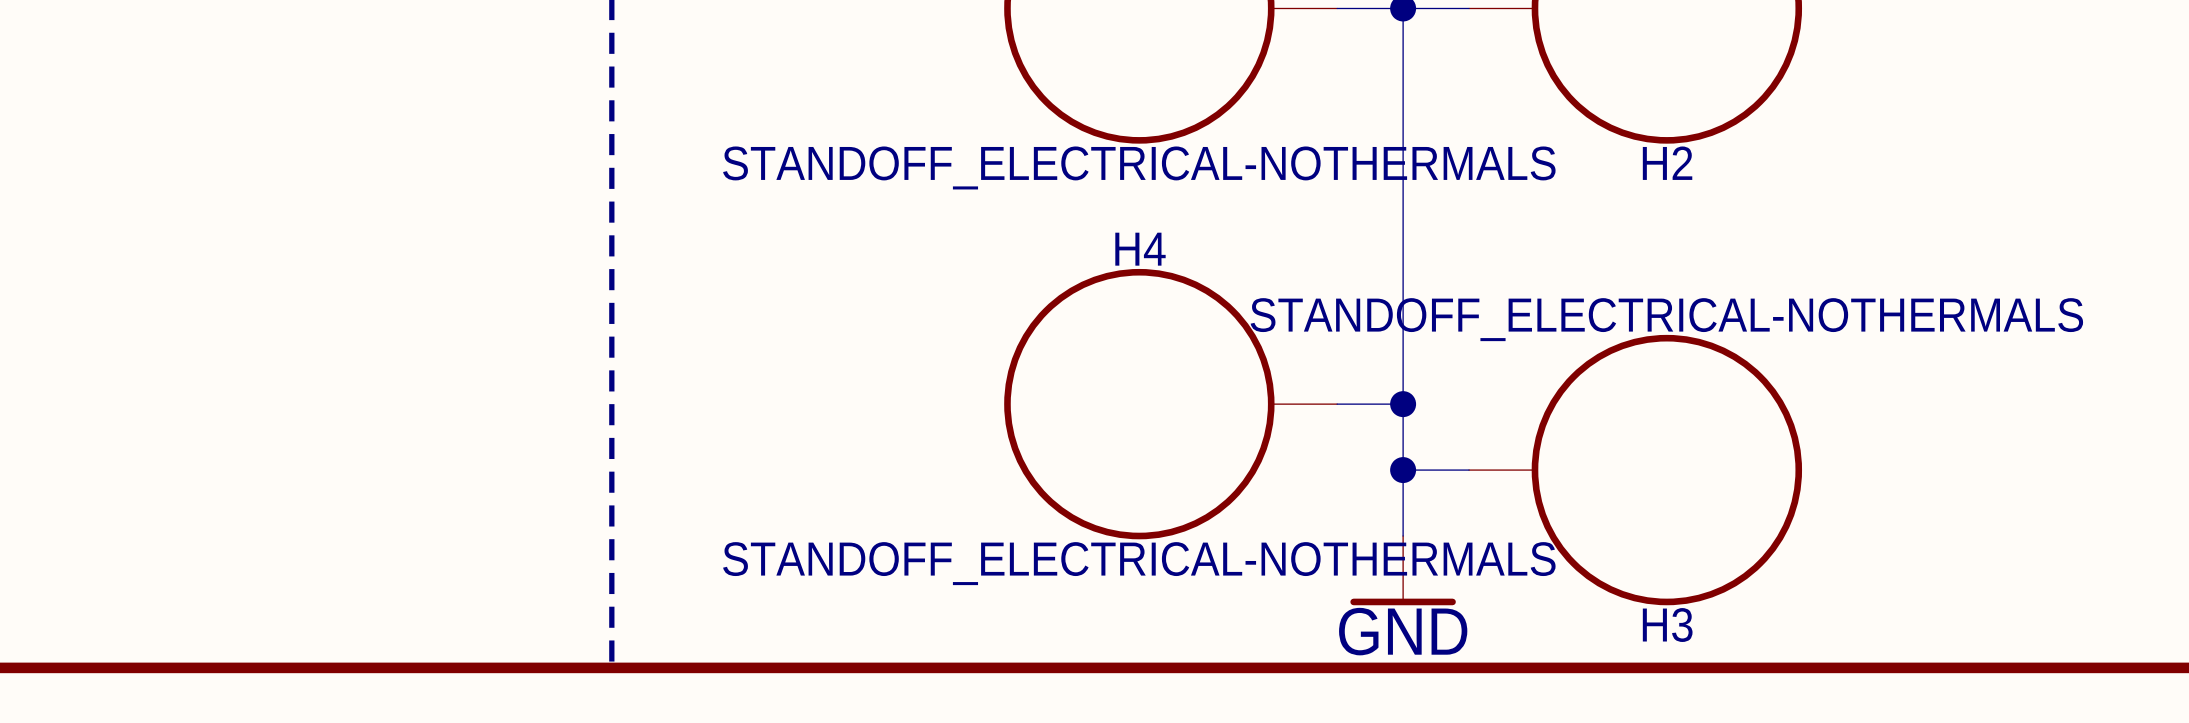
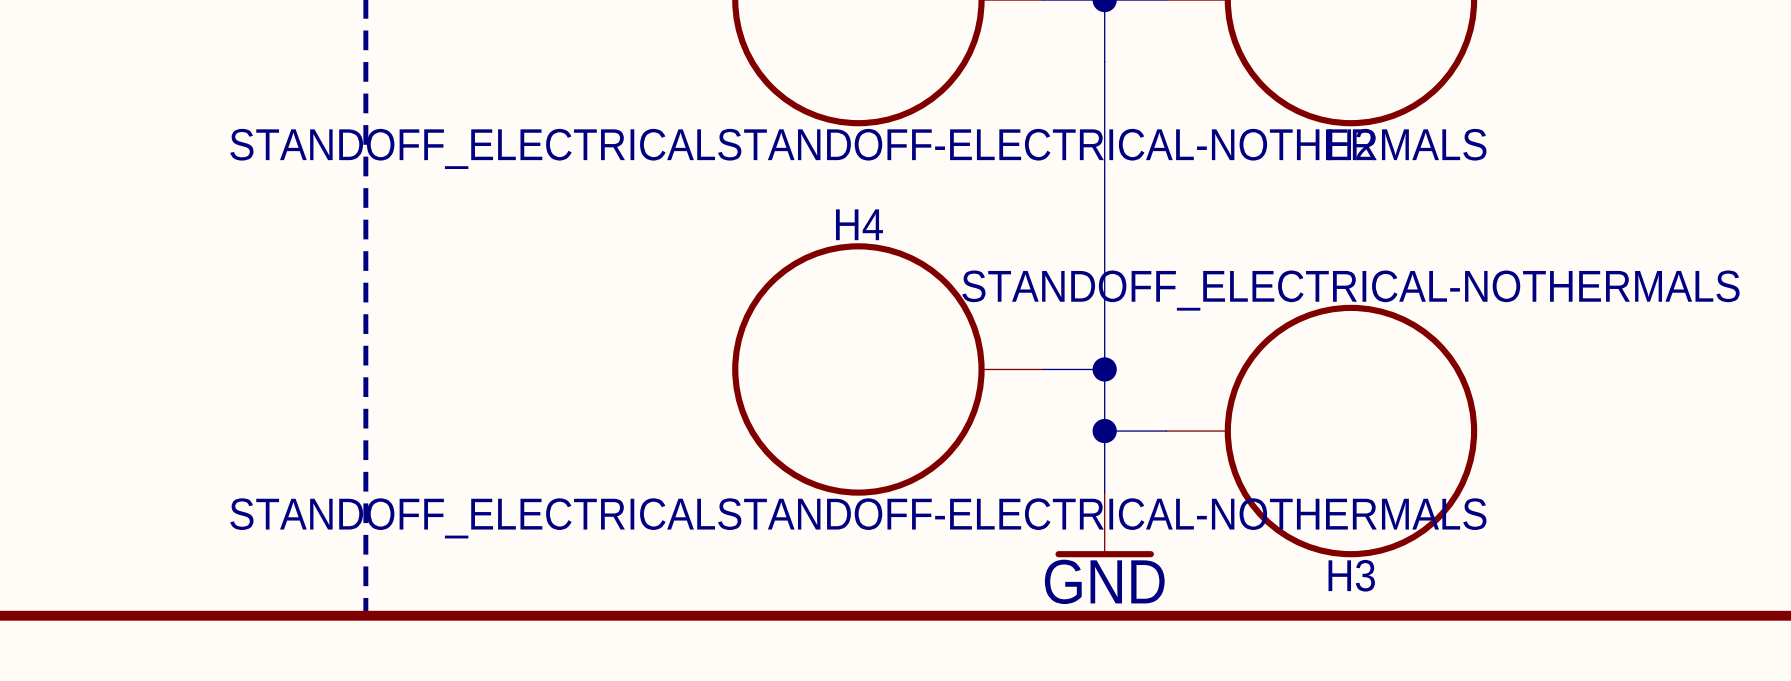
part value: STANDOFF_ELECTRICAL-NOTHERMALS (1139, 167) -> STANDOFF_ELECTRICALSTANDOFF-ELECTRICAL-NOTHERMALS (858, 148)
H4 value: STANDOFF_ELECTRICAL-NOTHERMALS (1139, 563) -> STANDOFF_ELECTRICALSTANDOFF-ELECTRICAL-NOTHERMALS (858, 518)

